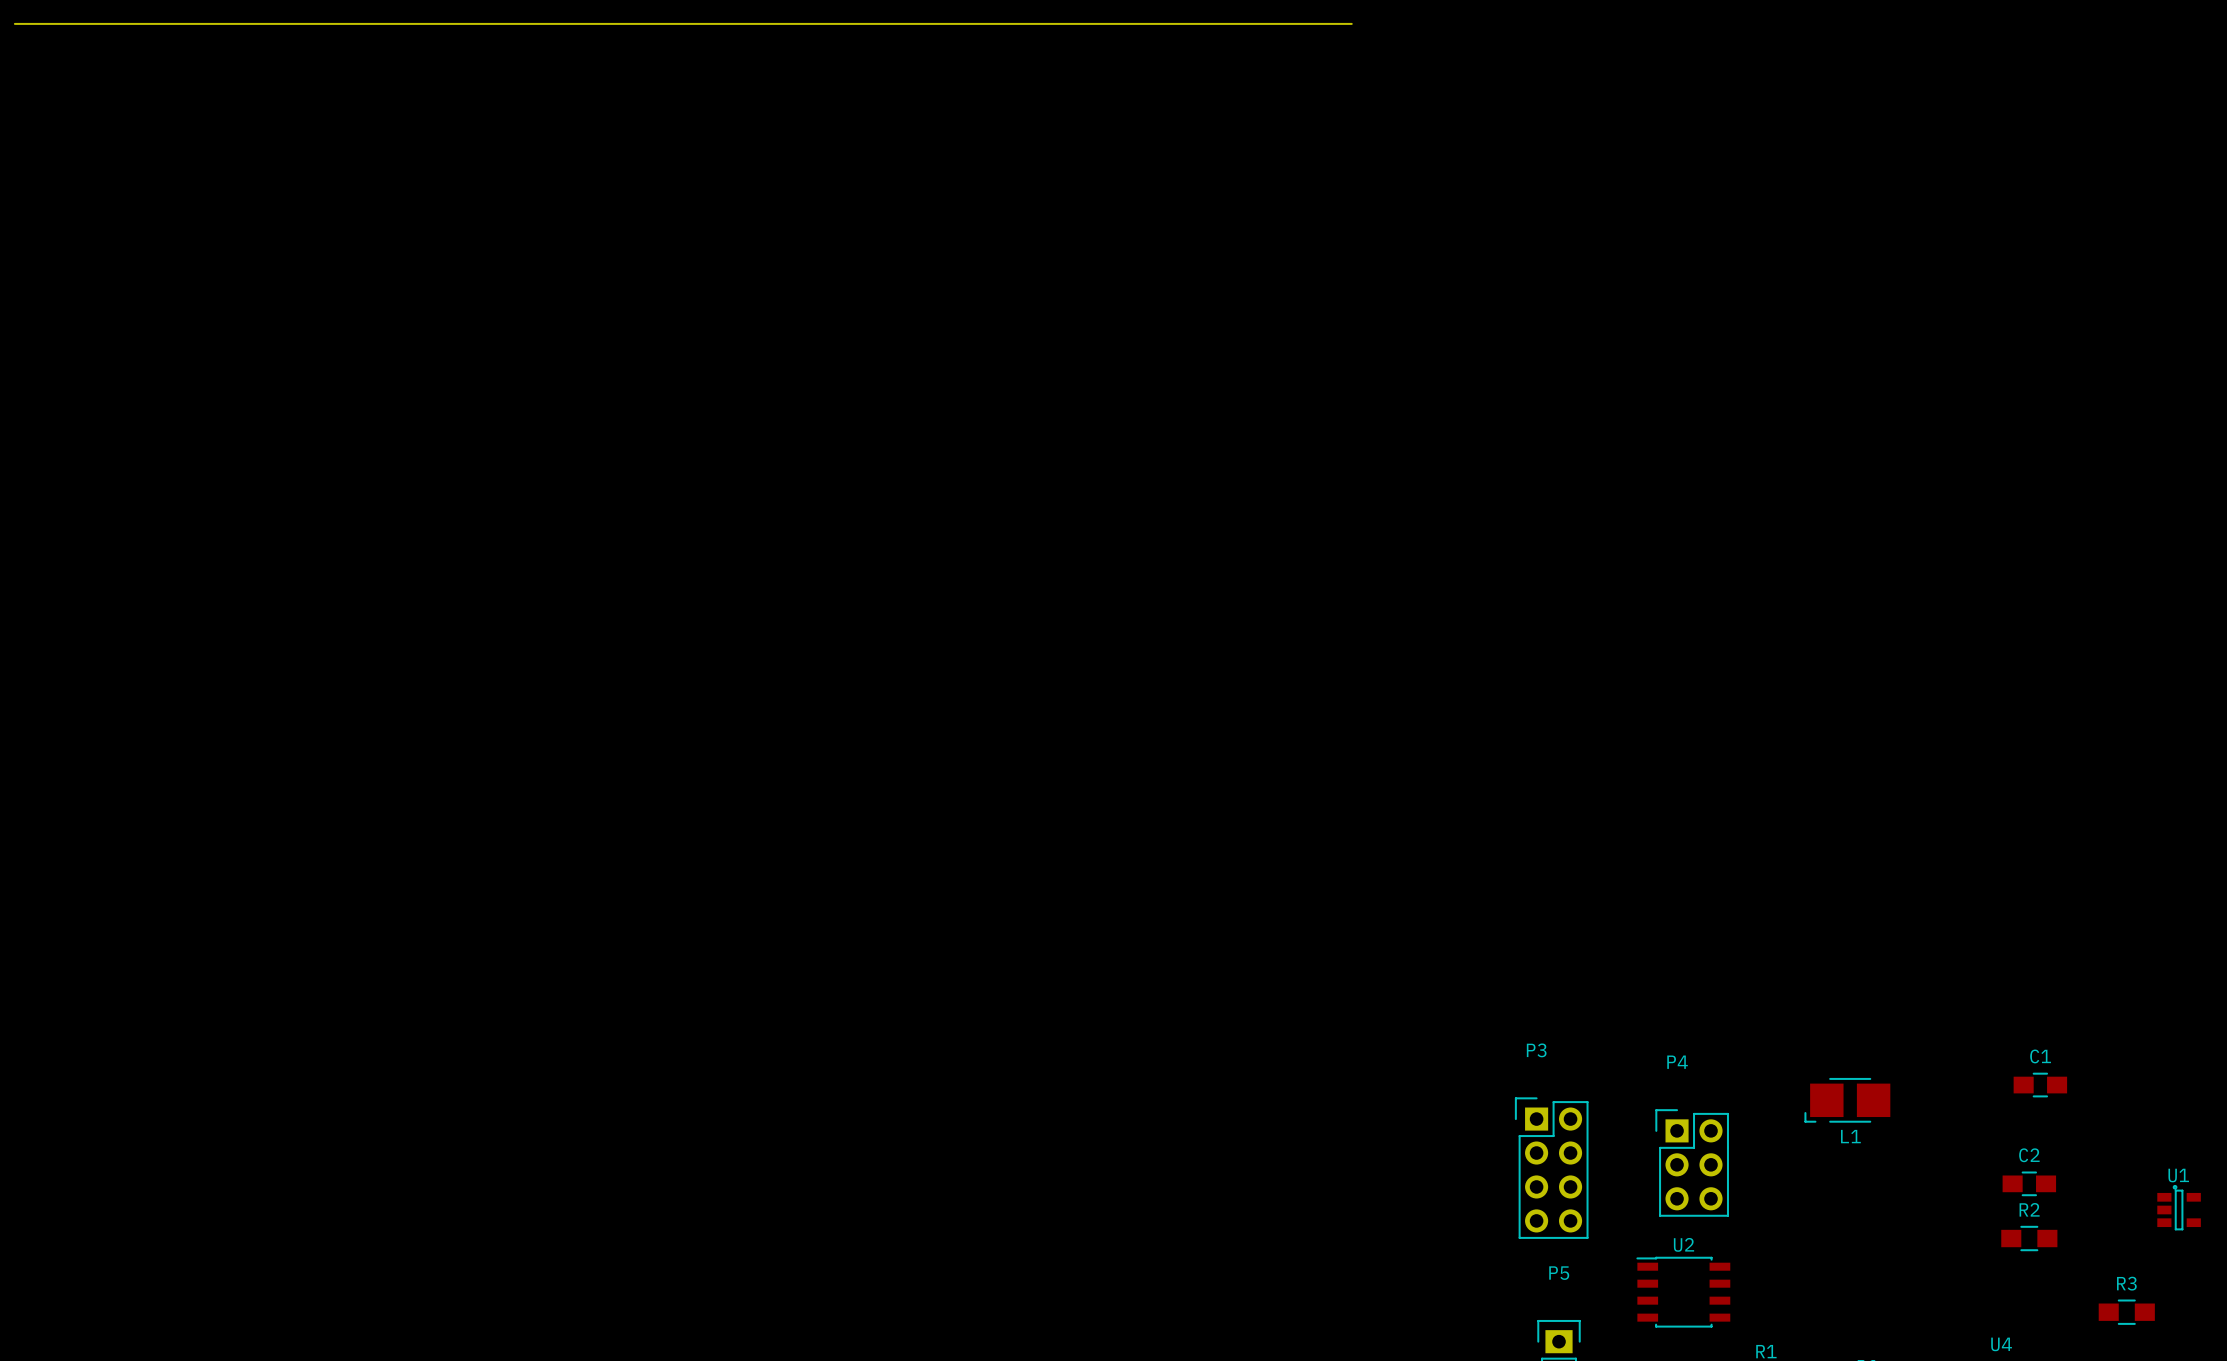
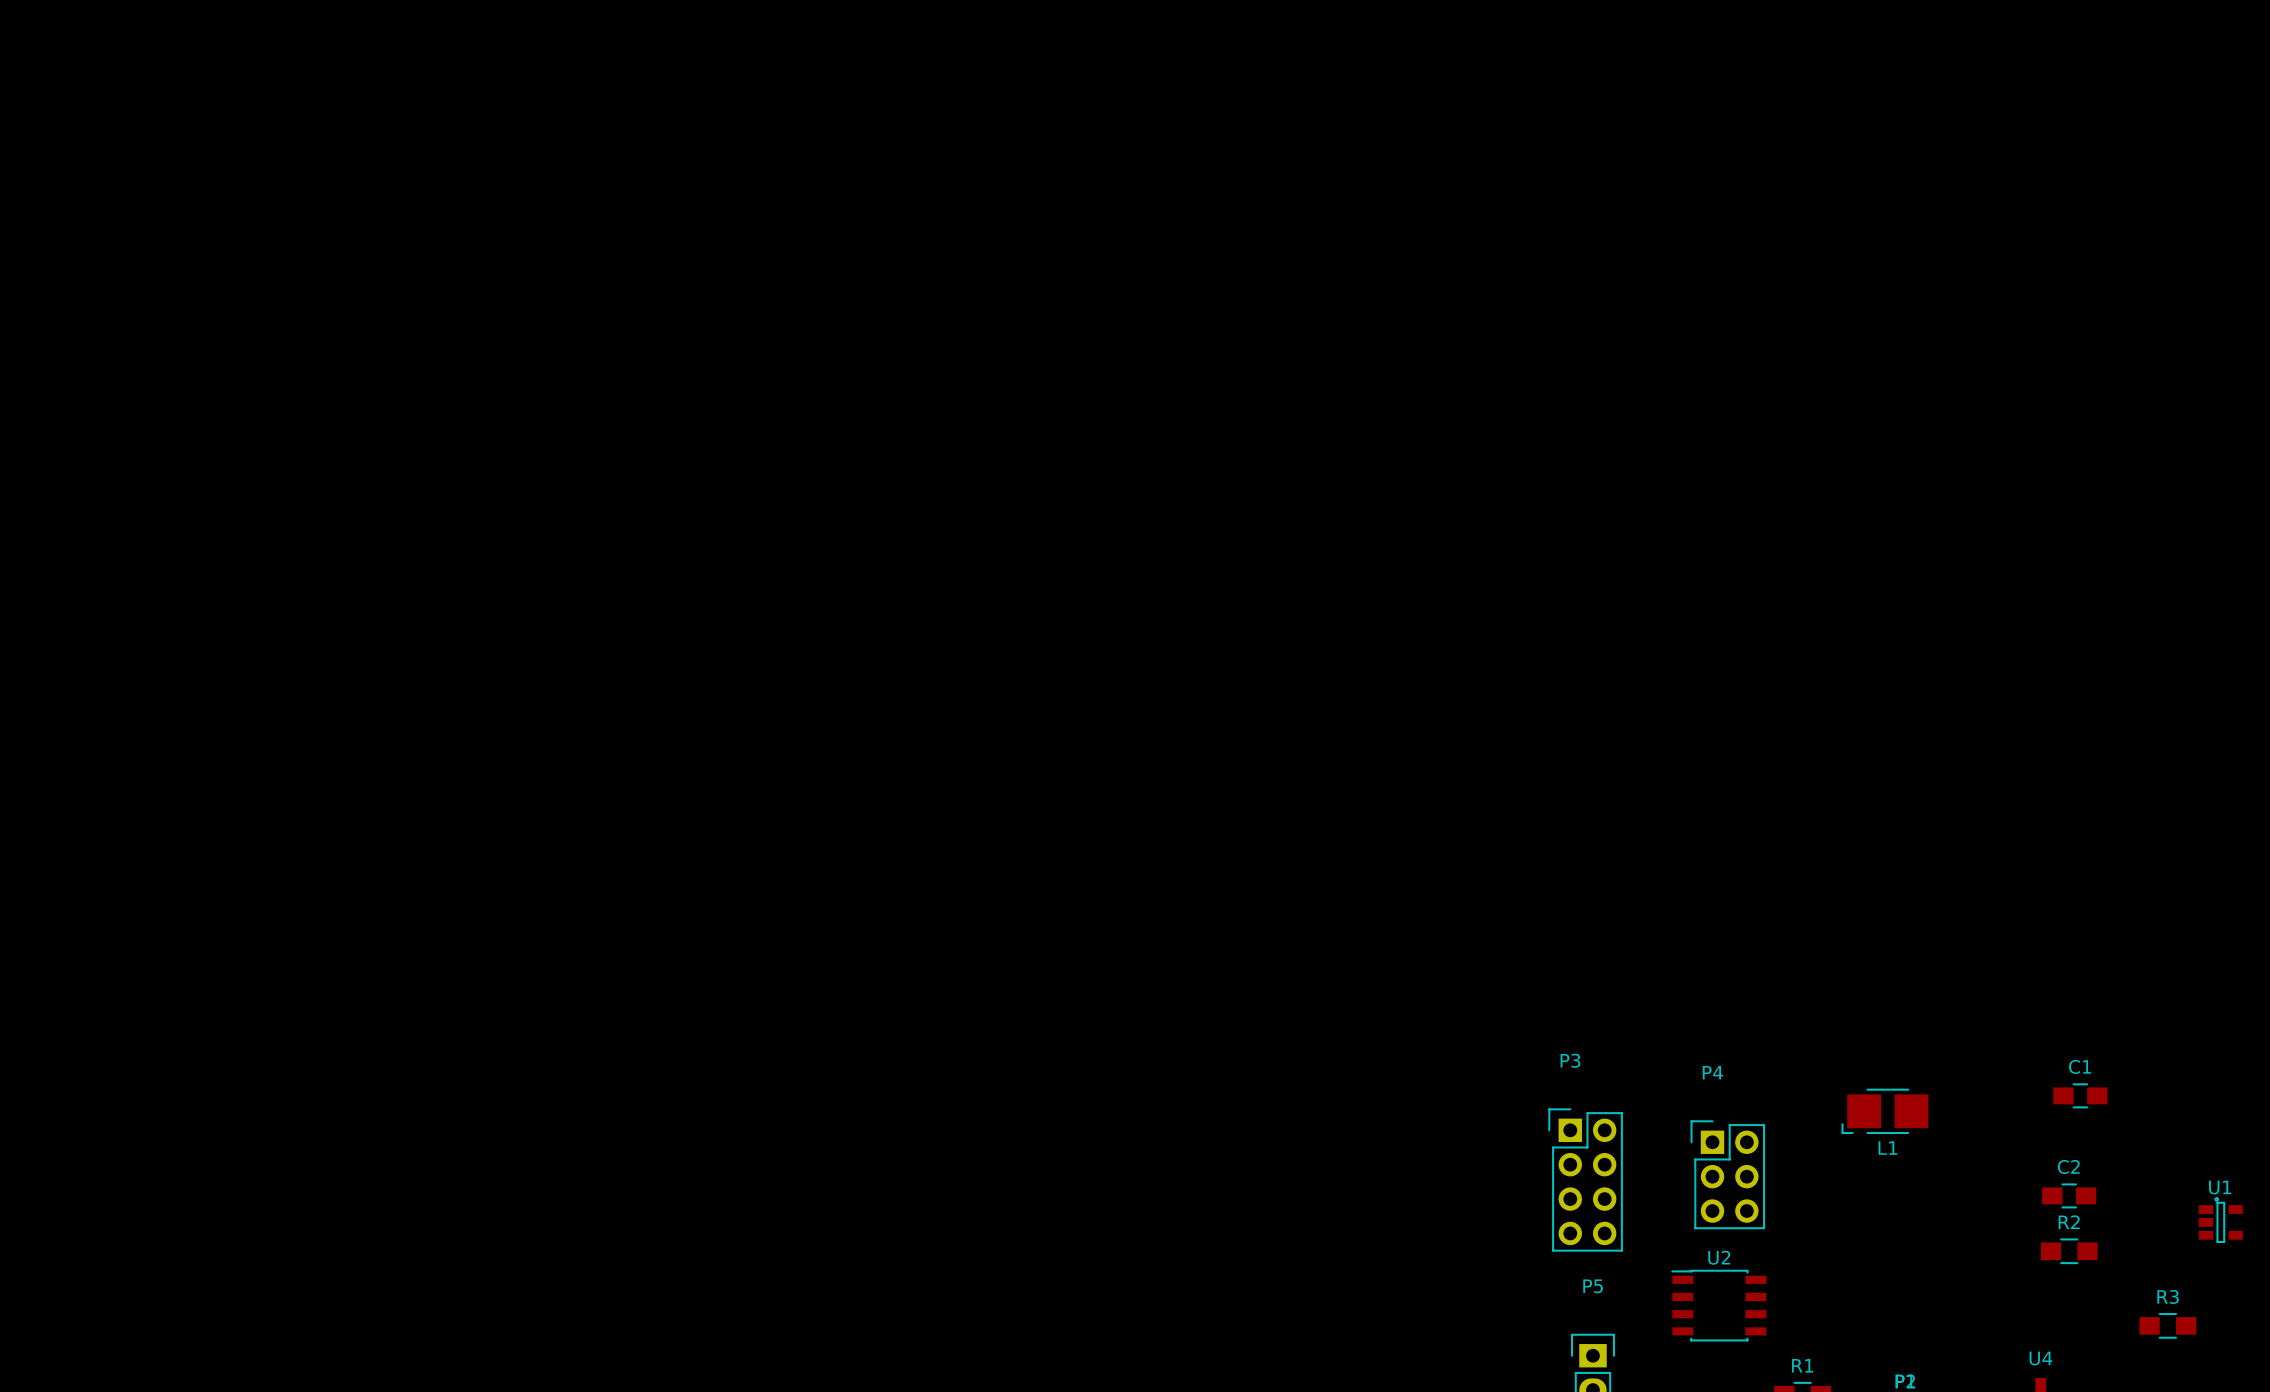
board edge: (14, 23) (1351, 23) -> none

